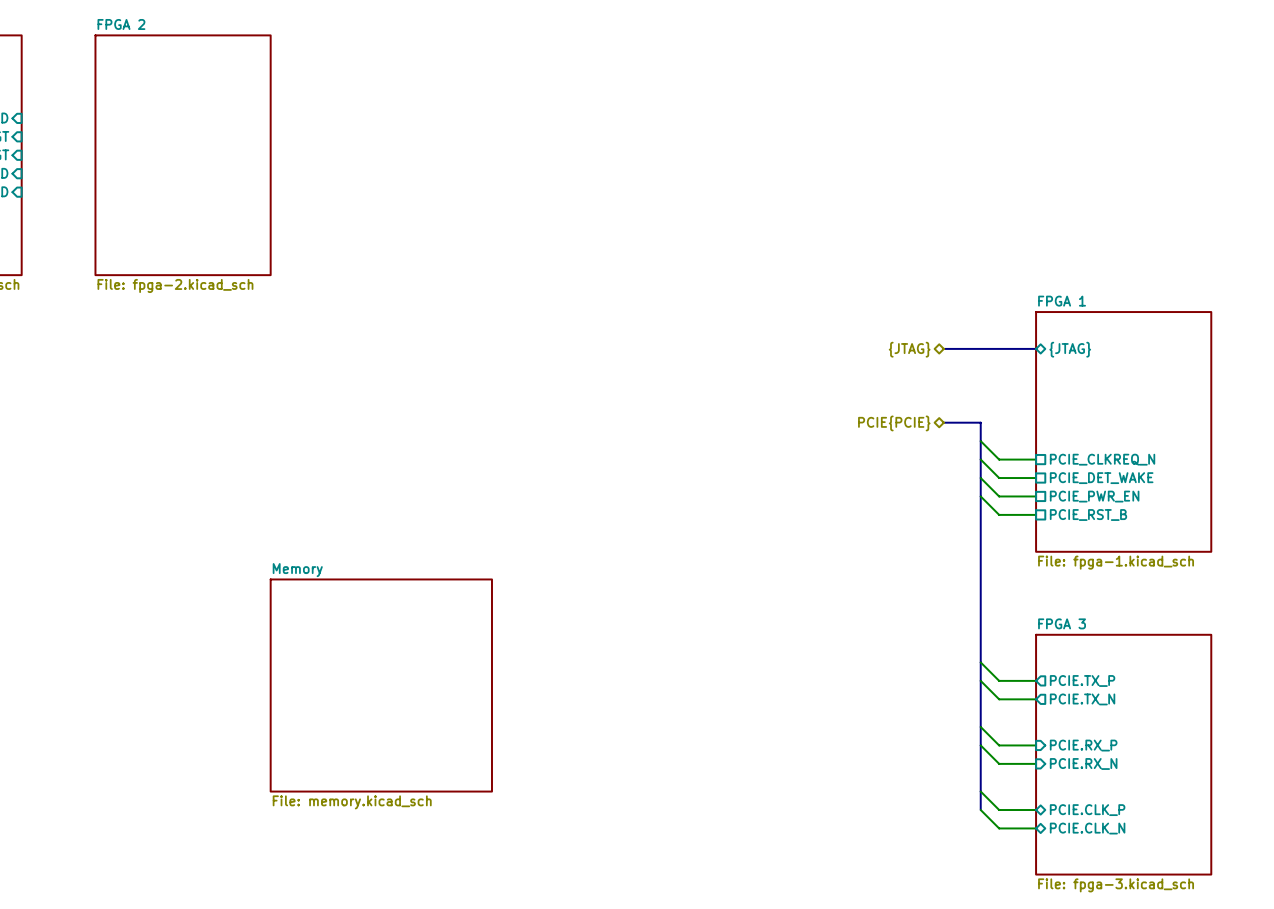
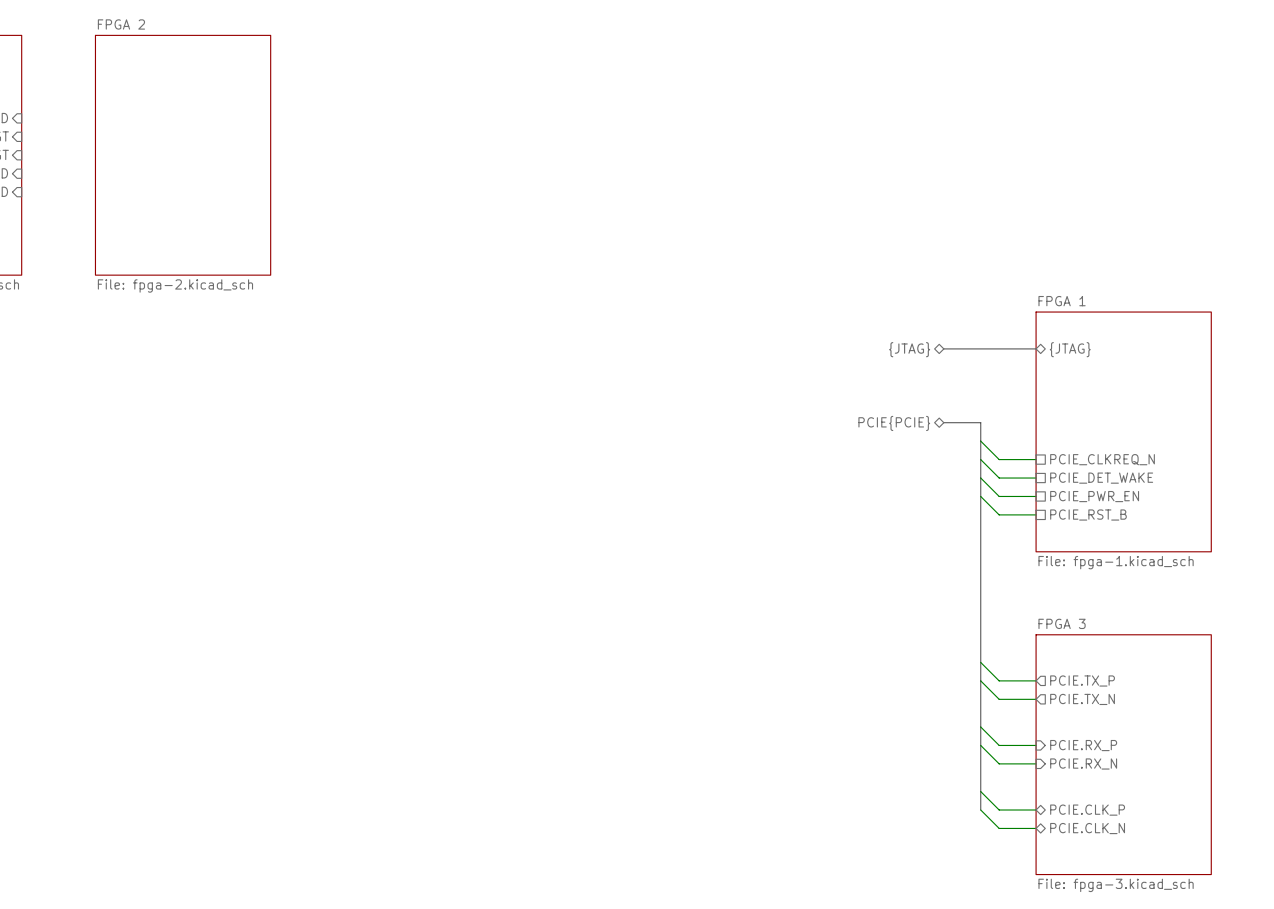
sheet Memory: File: memory.kicad_sch (381, 685) -> none

